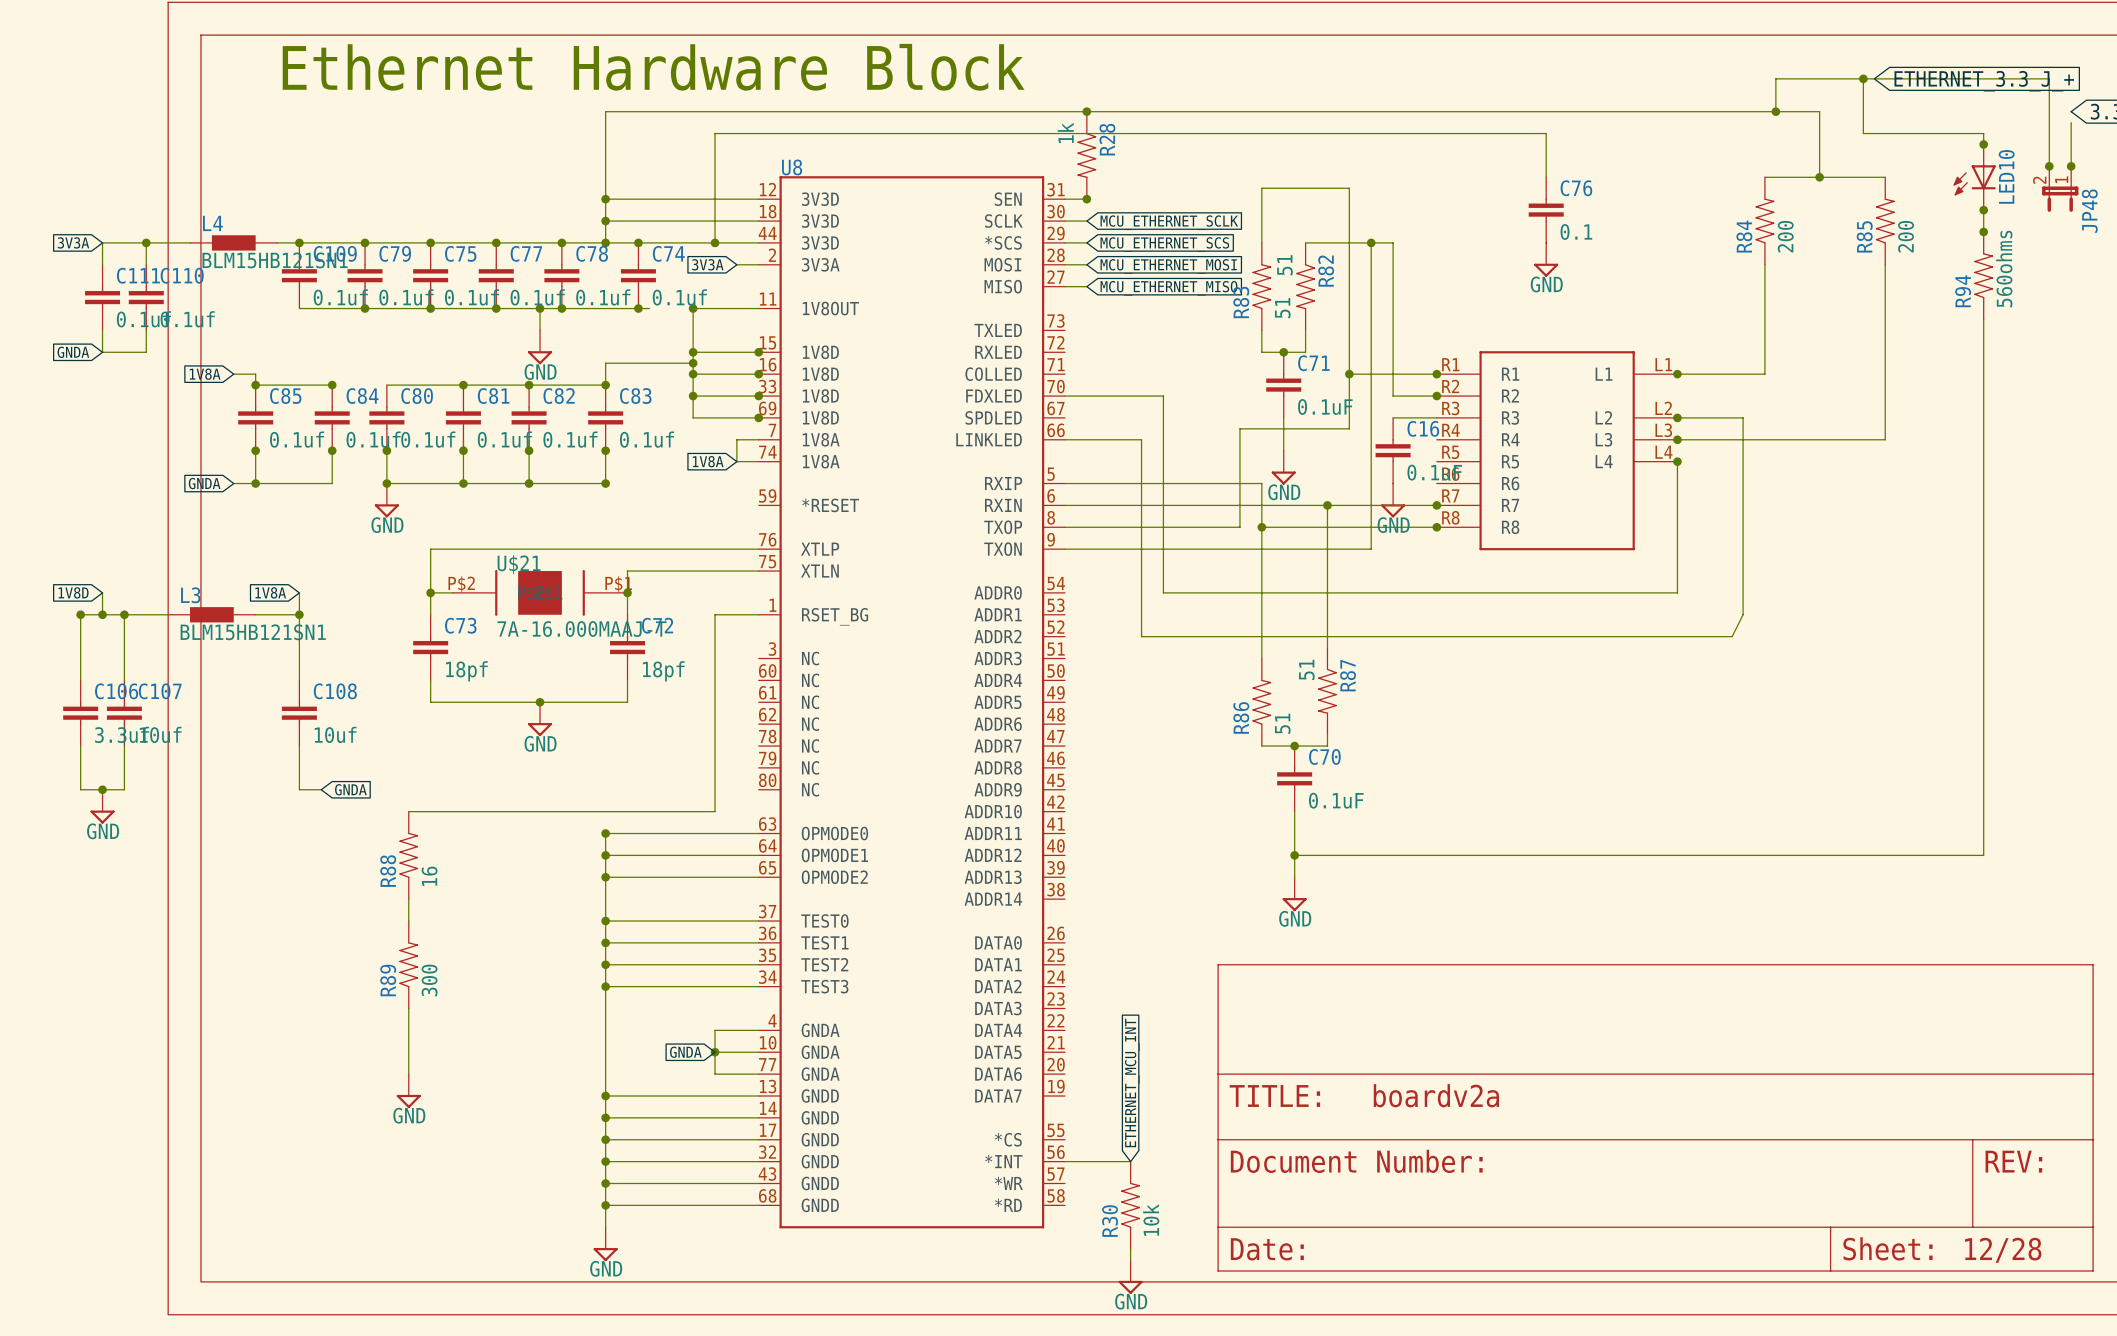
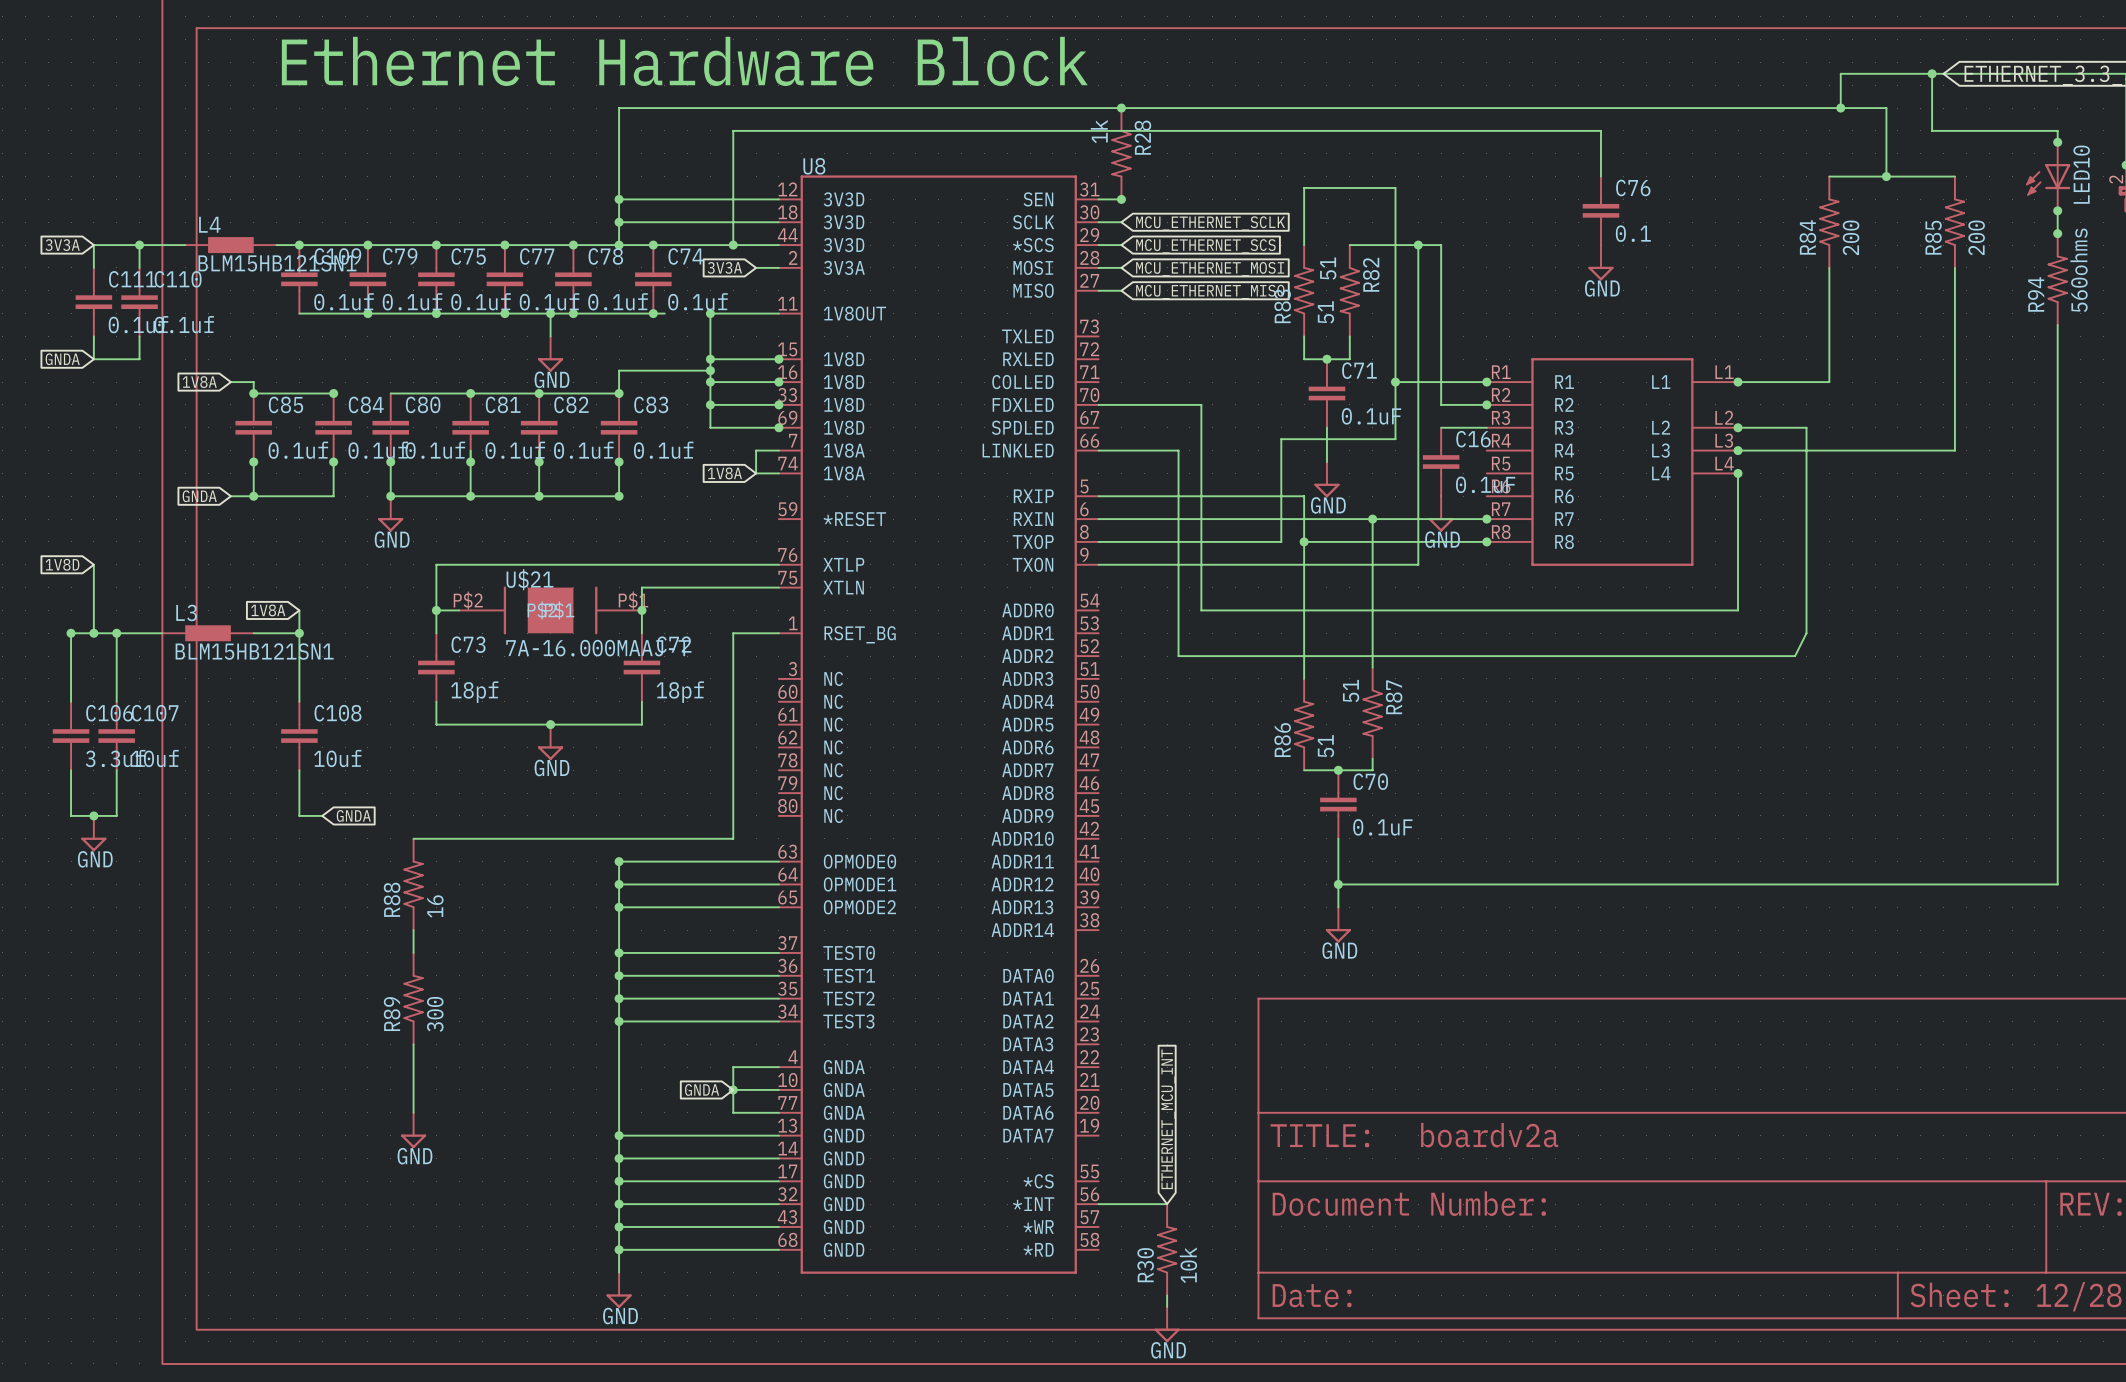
wire: none -> (93, 564) (93, 610)
global label position: 1V8D (73, 592) -> 1V8D (62, 564)

